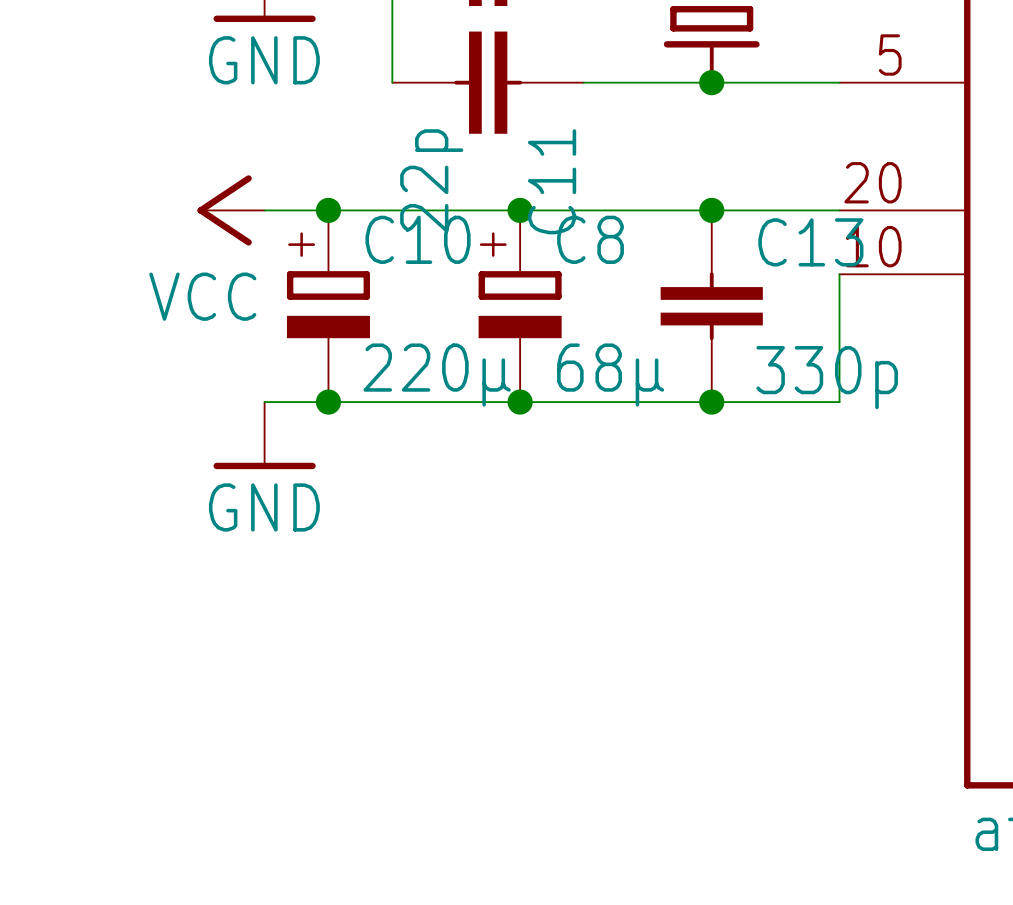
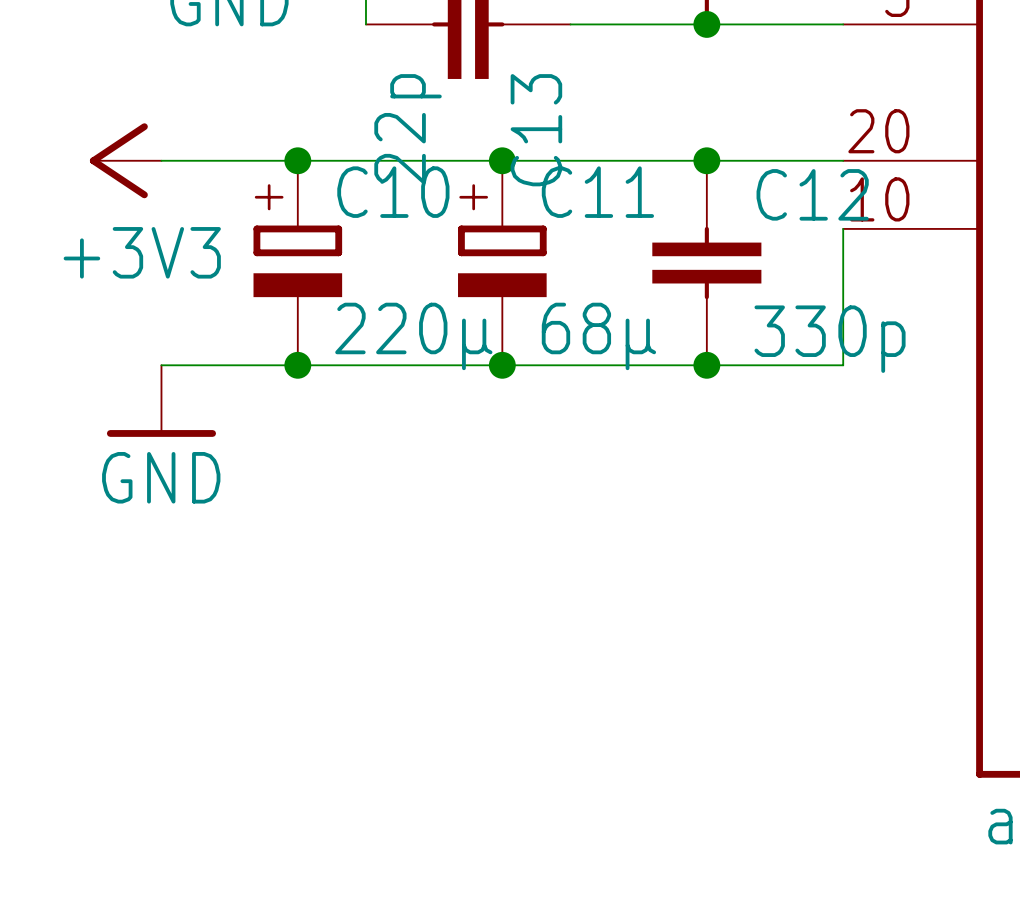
C11 name: C11 (552, 181) -> C13 (536, 130)
power symbol: none -> +3V3 (125, 160)
power symbol: VCC (231, 210) -> none
C8 name: C8 (590, 239) -> C11 (597, 192)
C13 name: C13 (810, 242) -> C12 (812, 194)
wire: none -> (161, 365) (229, 365)
power symbol position: GND (264, 435) -> GND (161, 401)

